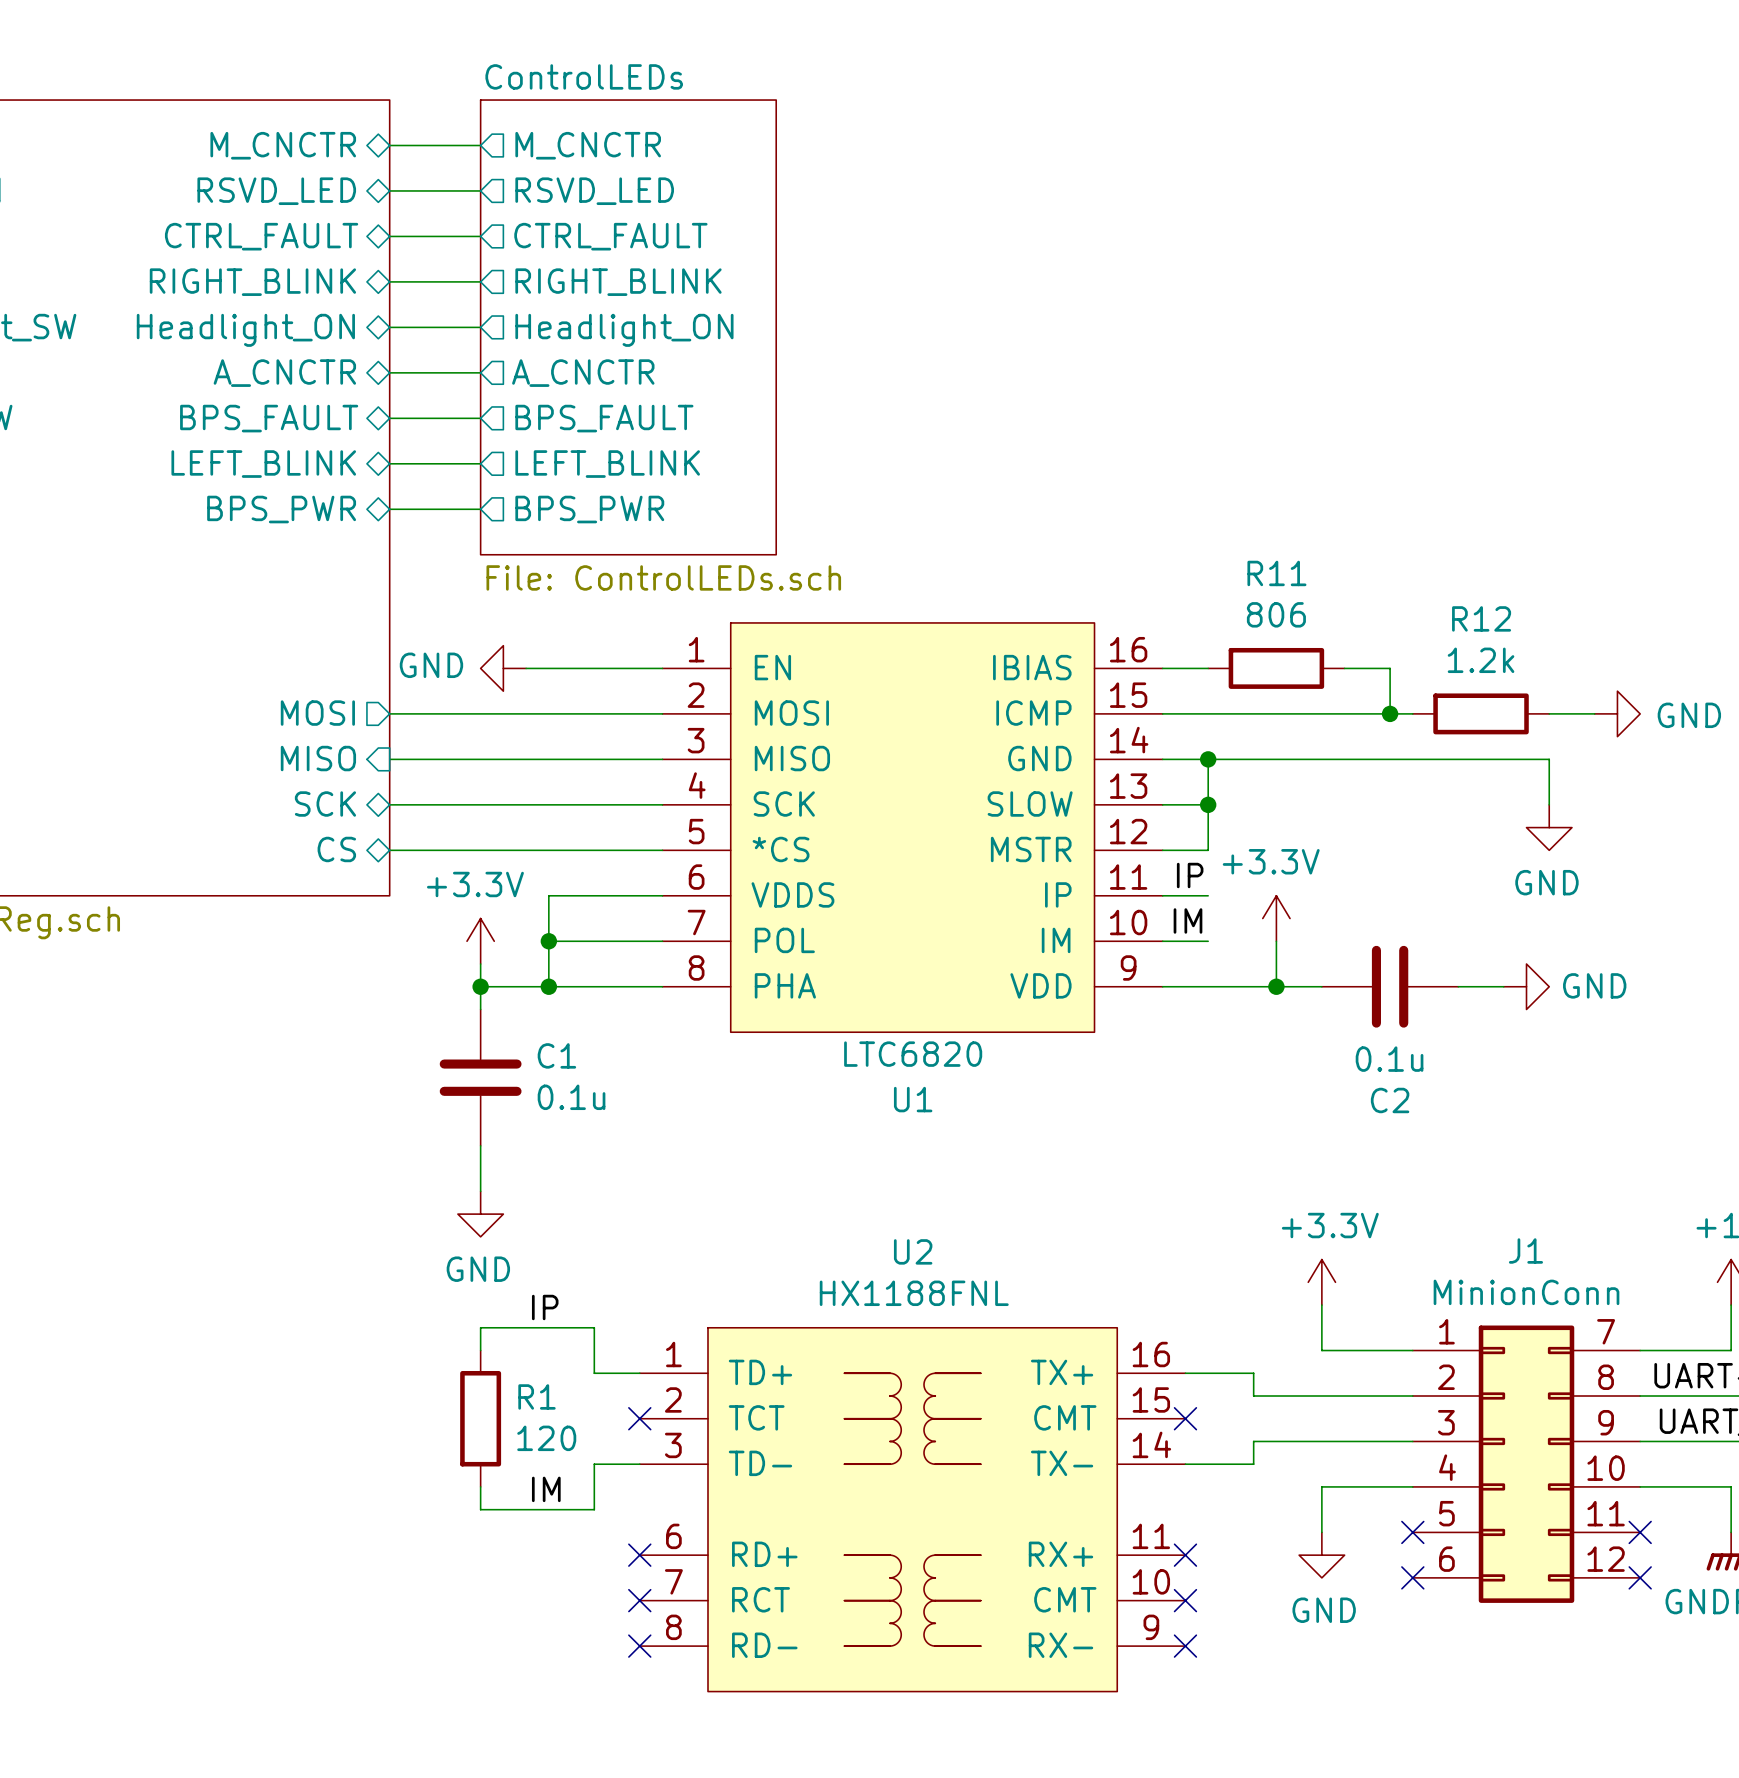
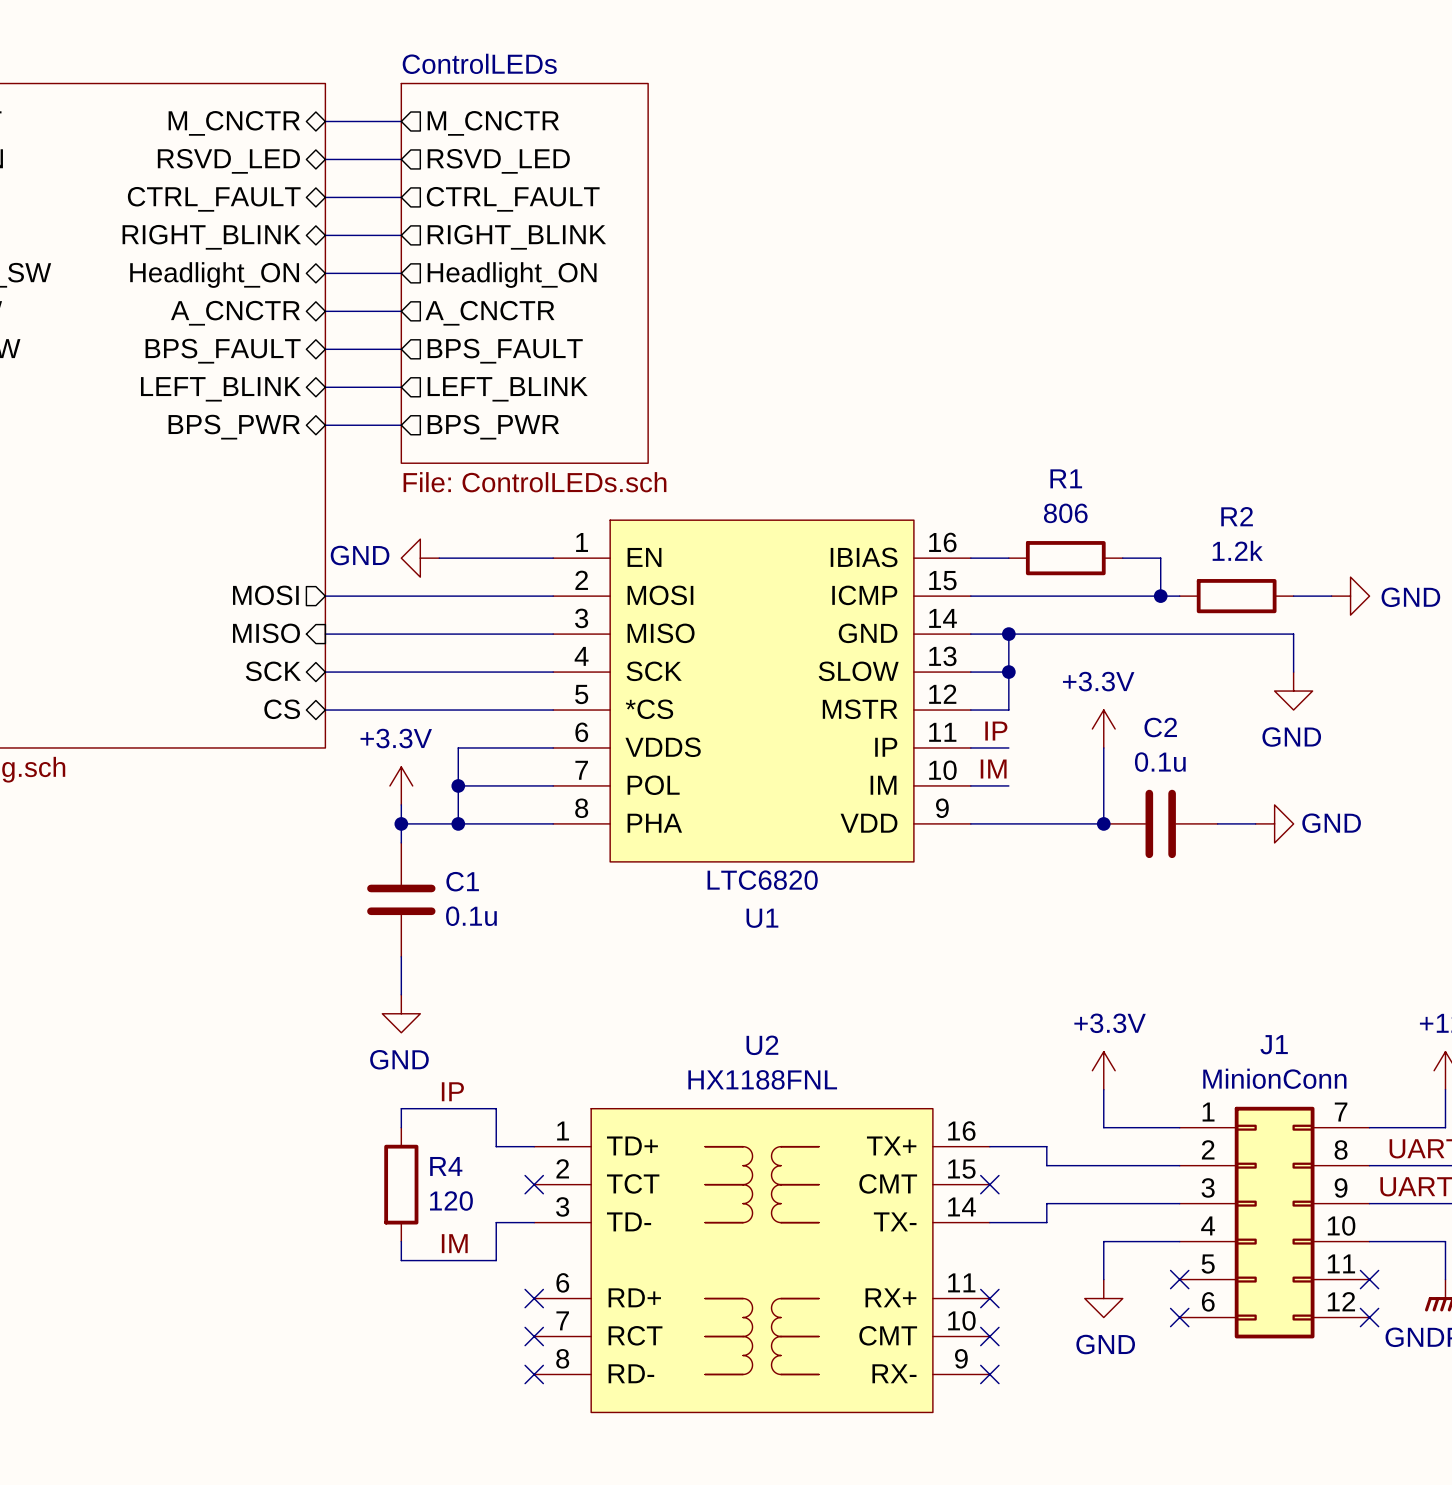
R11 name: R11 (1276, 573) -> R1 (1066, 478)
R12 name: R12 (1481, 618) -> R2 (1237, 516)
wire: none -> (1103, 747) (1103, 823)
power symbol position: +3.3V (1276, 918) -> +3.3V (1103, 729)
wire: (1276, 941) (1276, 986) -> none
junction position: (1276, 986) -> (1103, 823)
C2 value position: 0.1u (1389, 1059) -> 0.1u (1160, 762)
C2 name position: C2 (1390, 1100) -> C2 (1160, 727)
R1 name: R1 (536, 1396) -> R4 (446, 1166)

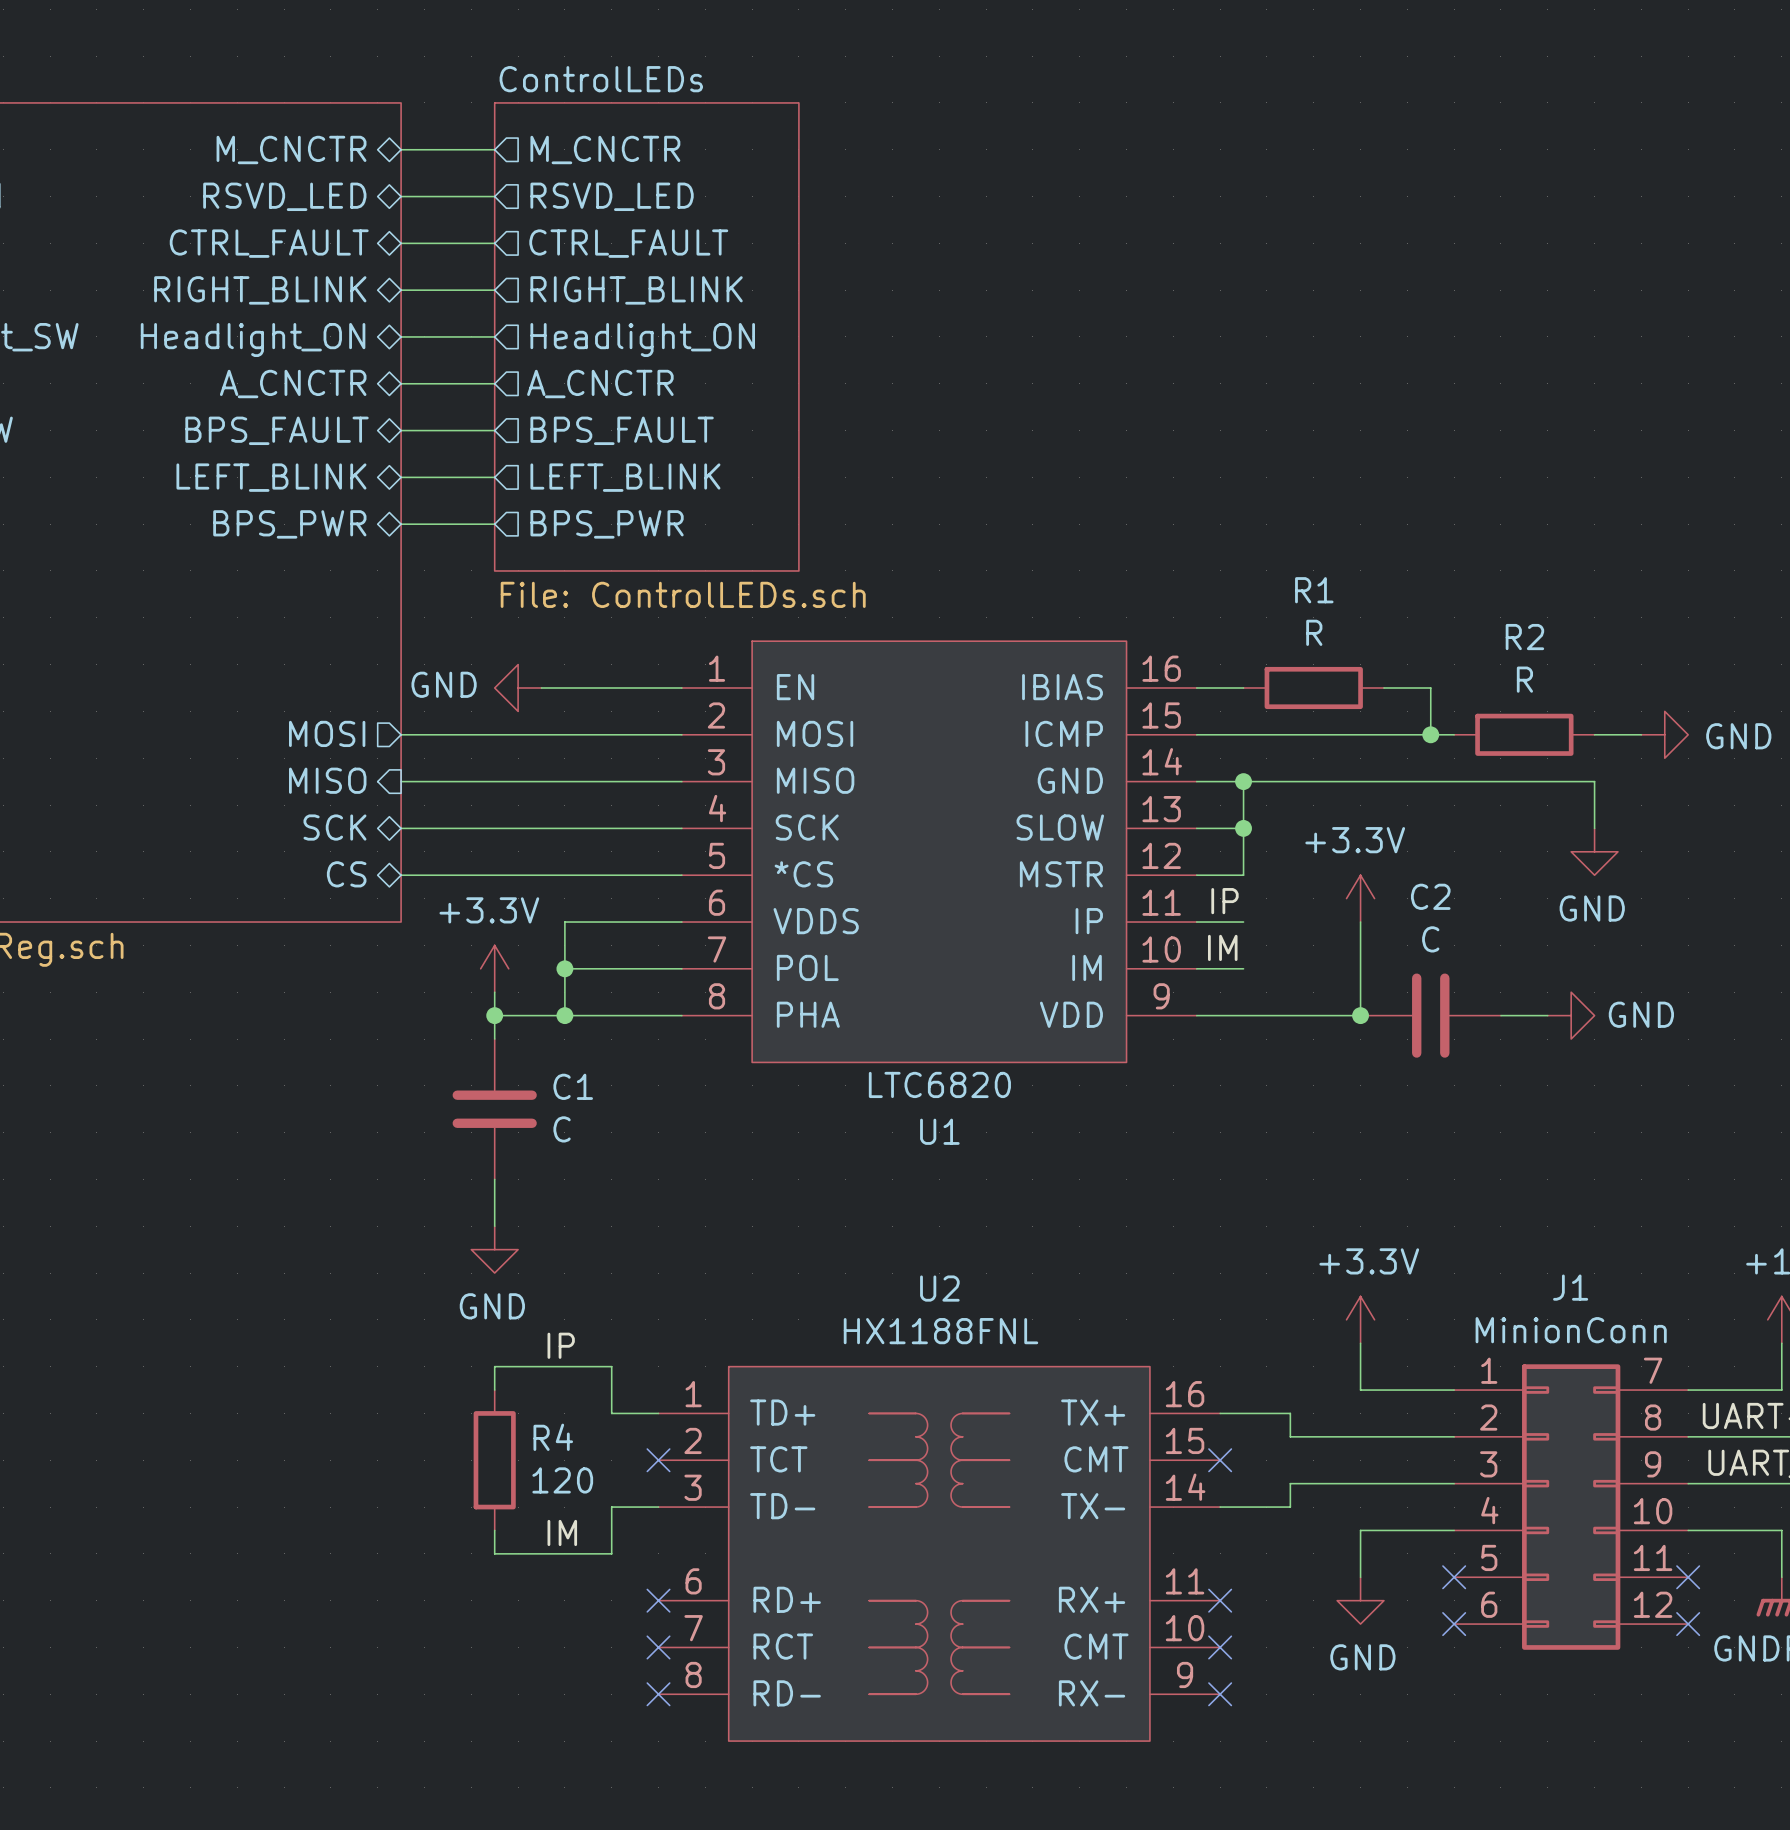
R1 value: 806 (1065, 513) -> R (1314, 632)
R2 value: 1.2k (1237, 550) -> R (1524, 679)
C2 value: 0.1u (1160, 762) -> C (1430, 939)
C1 value: 0.1u (471, 916) -> C (562, 1129)

